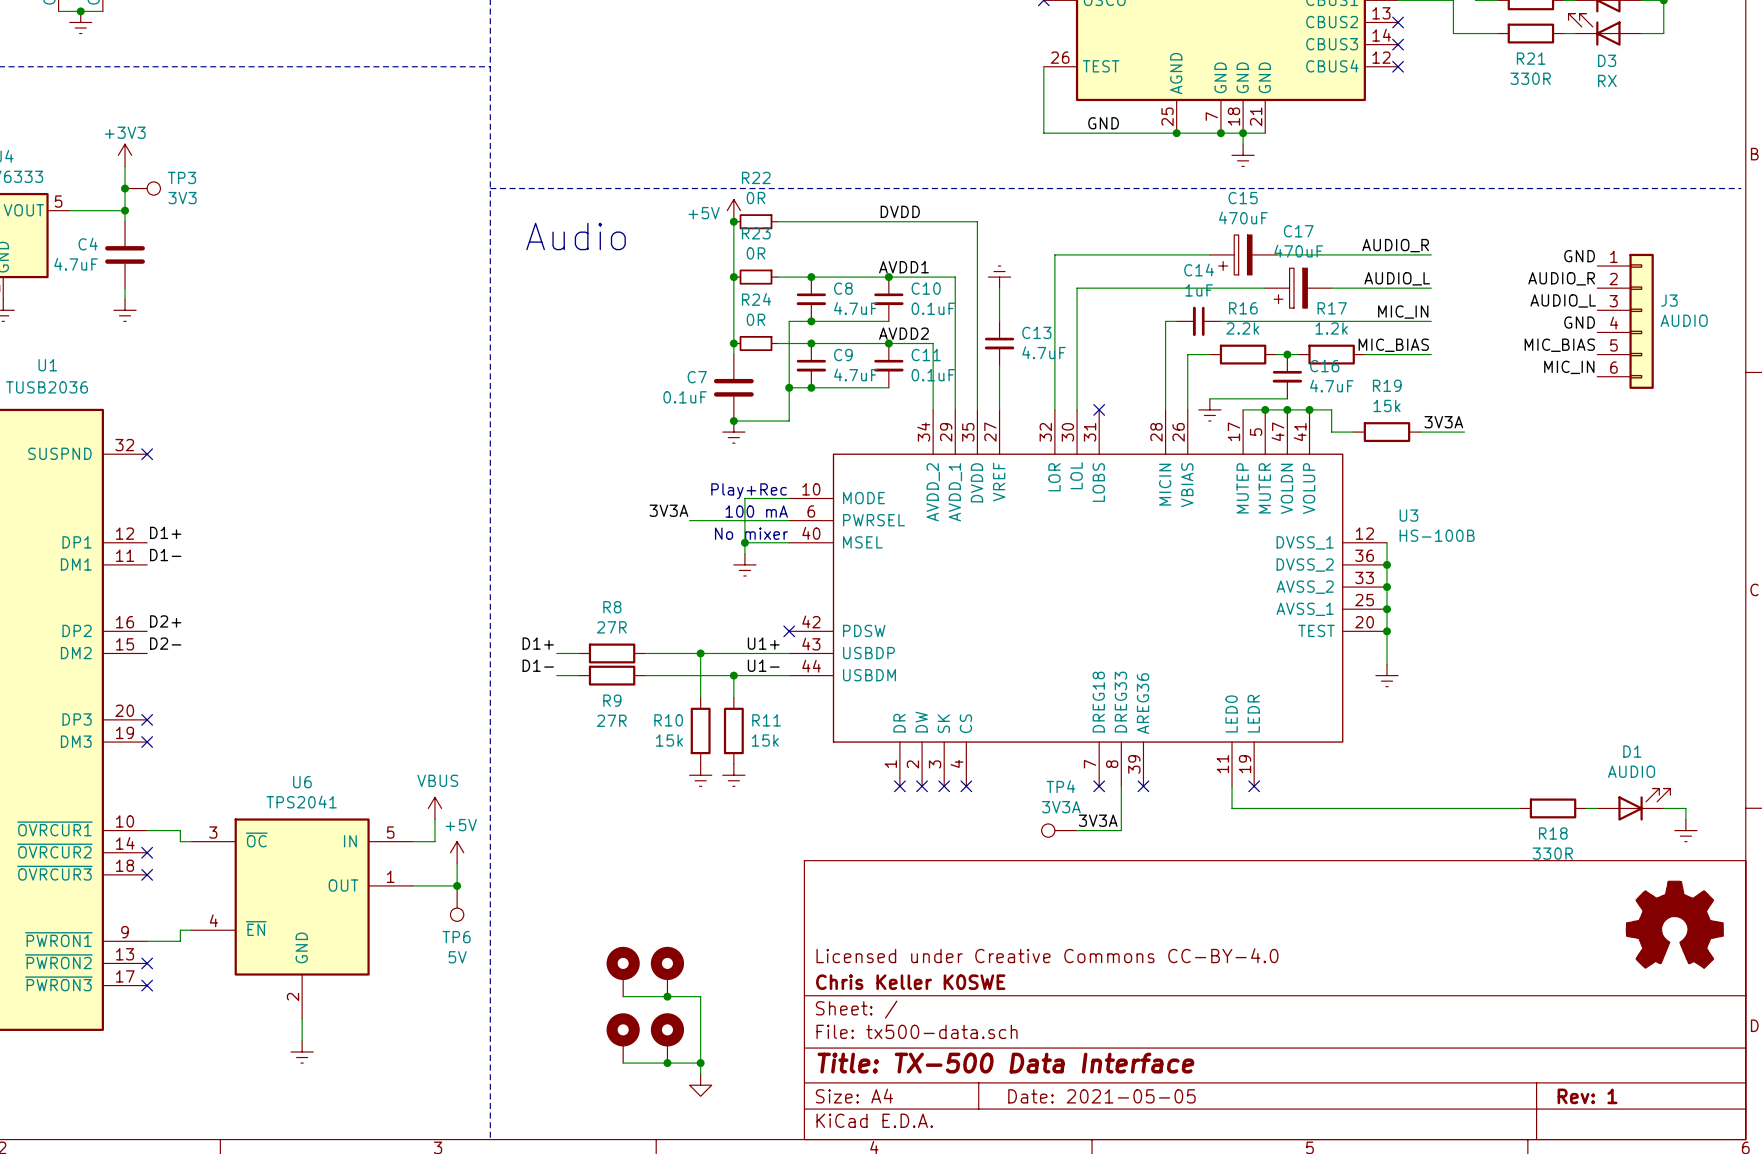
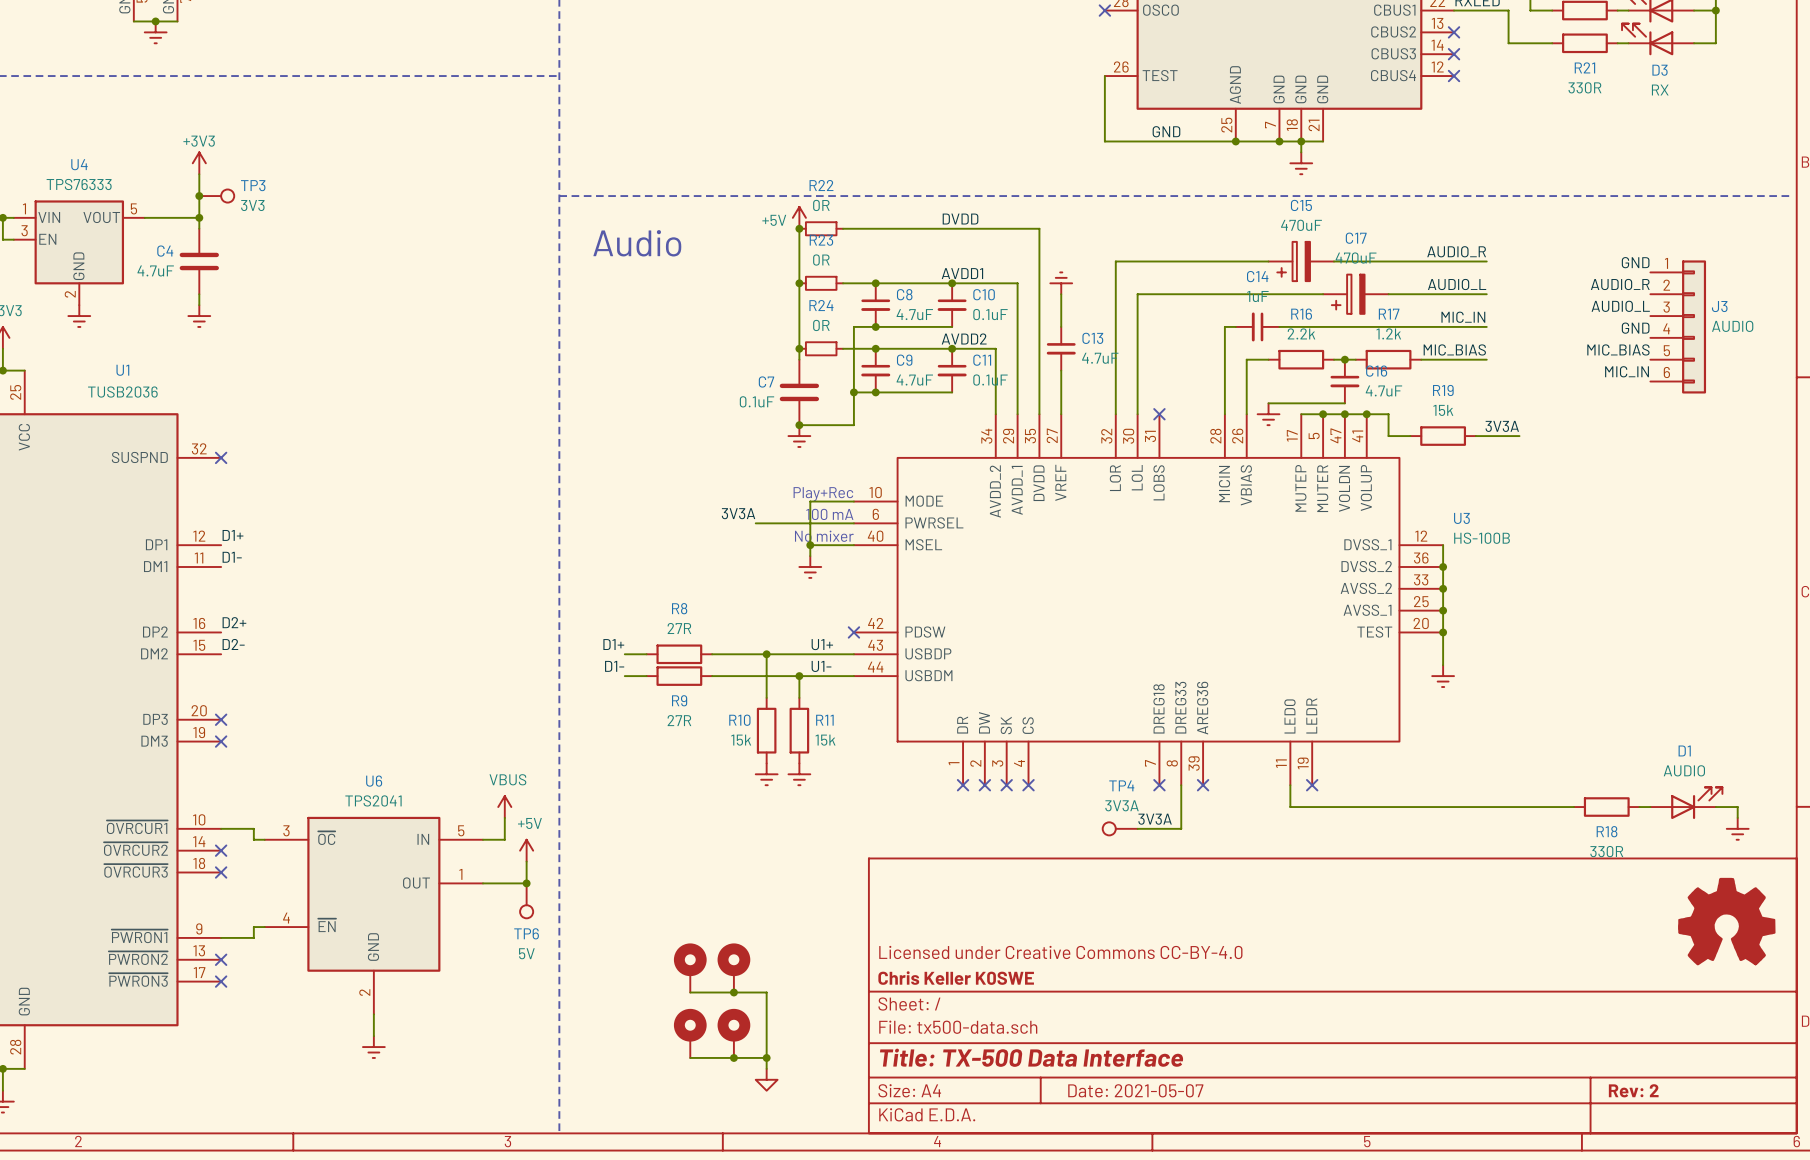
title block: Date: 2021-05-05 (1101, 1096) -> Date: 2021-05-07 (1135, 1090)
title block: Rev: 1 (1587, 1096) -> Rev: 2 (1633, 1090)

